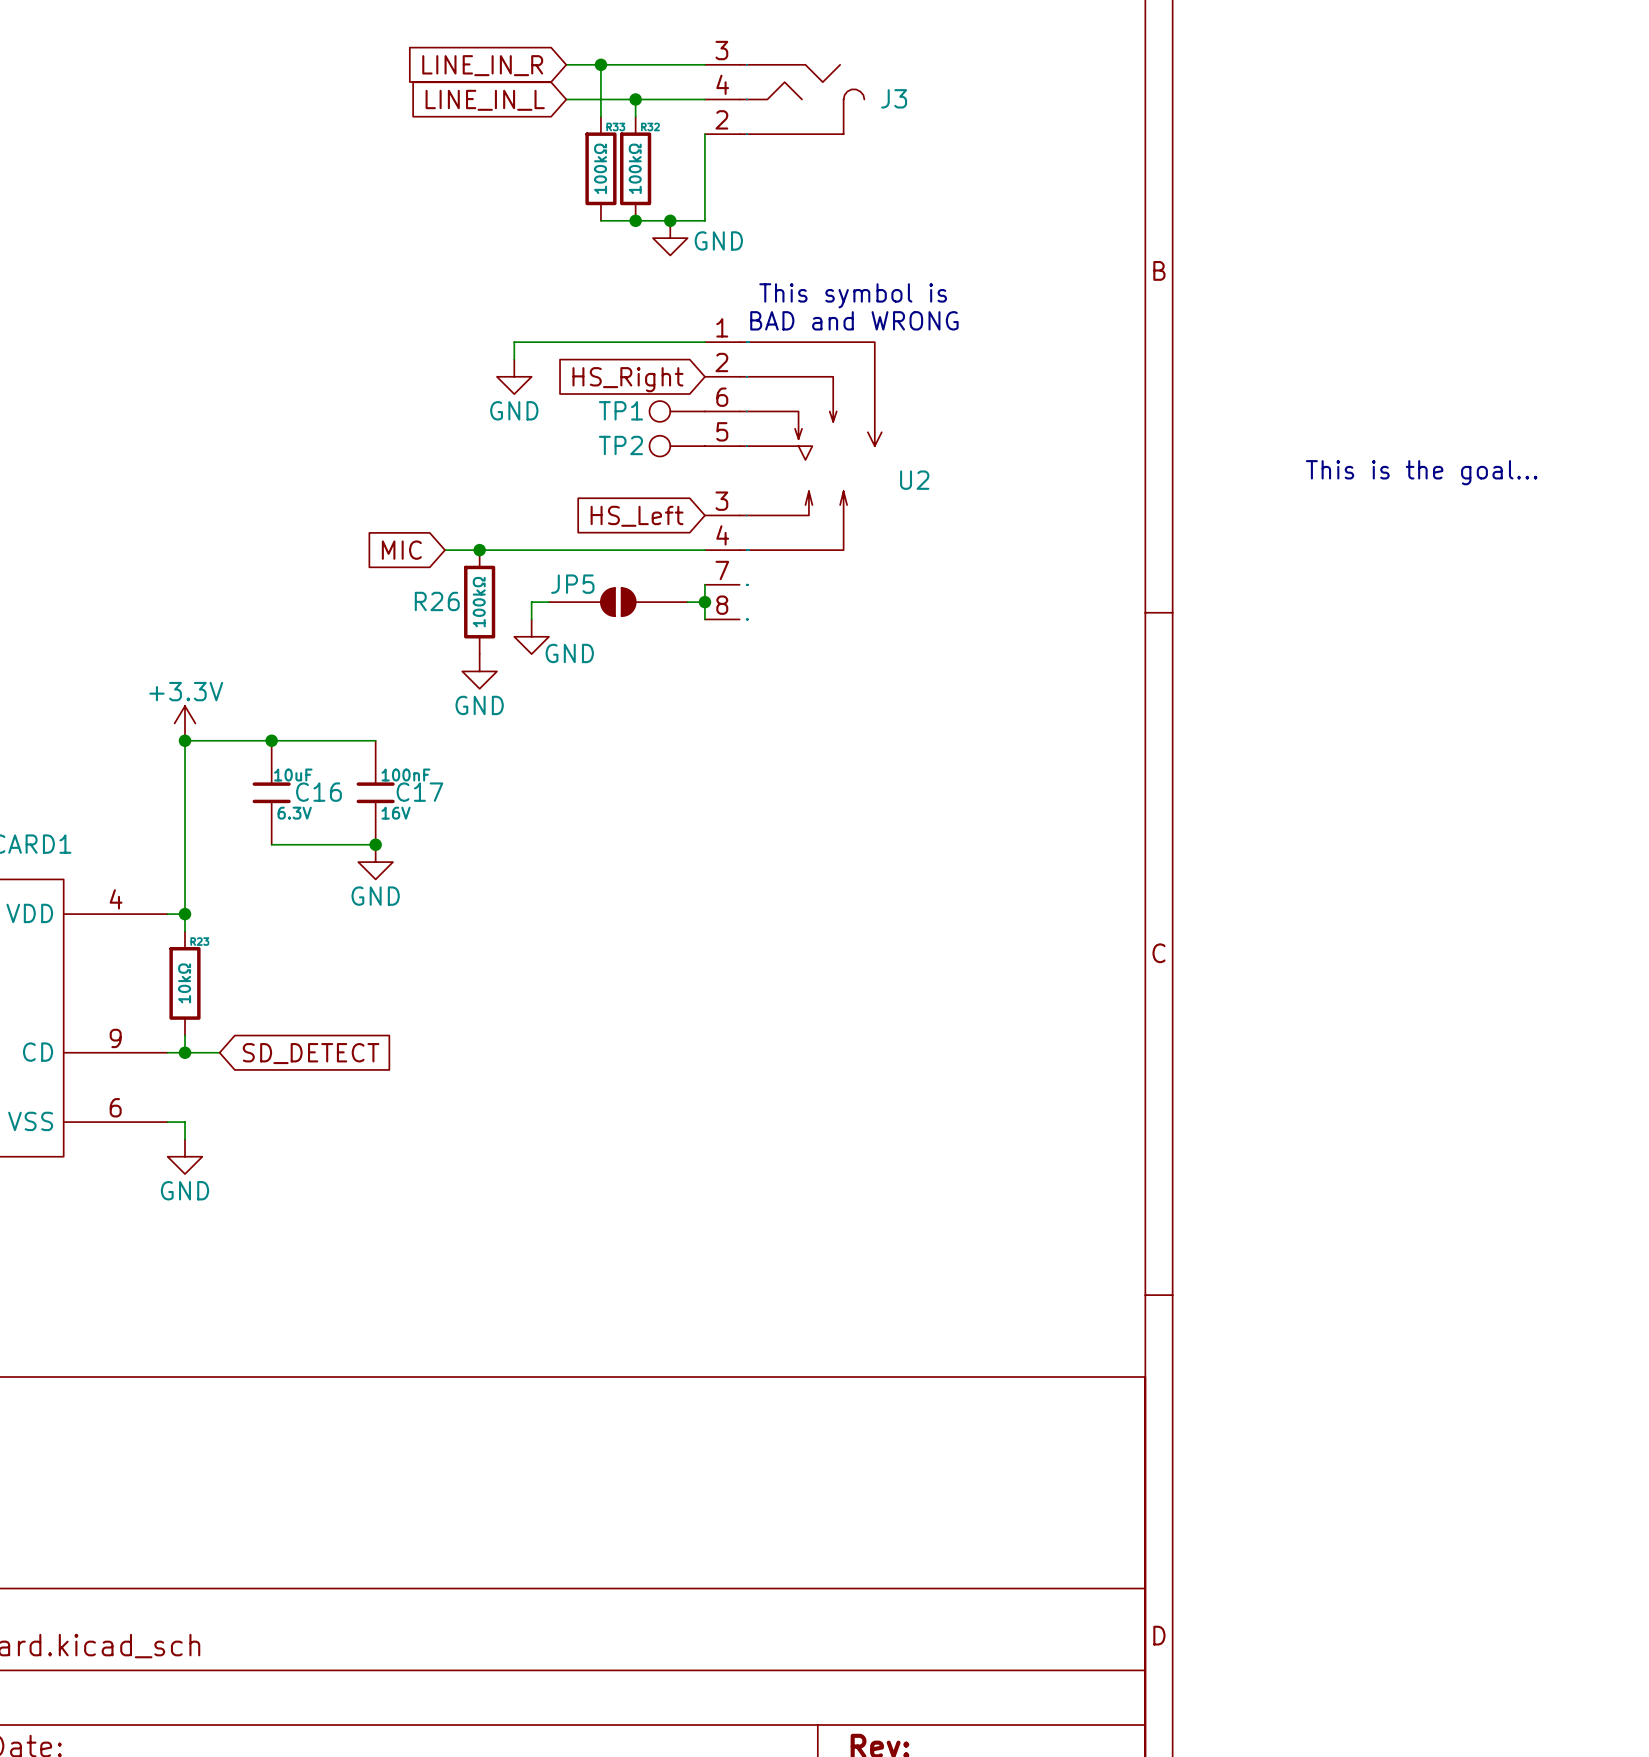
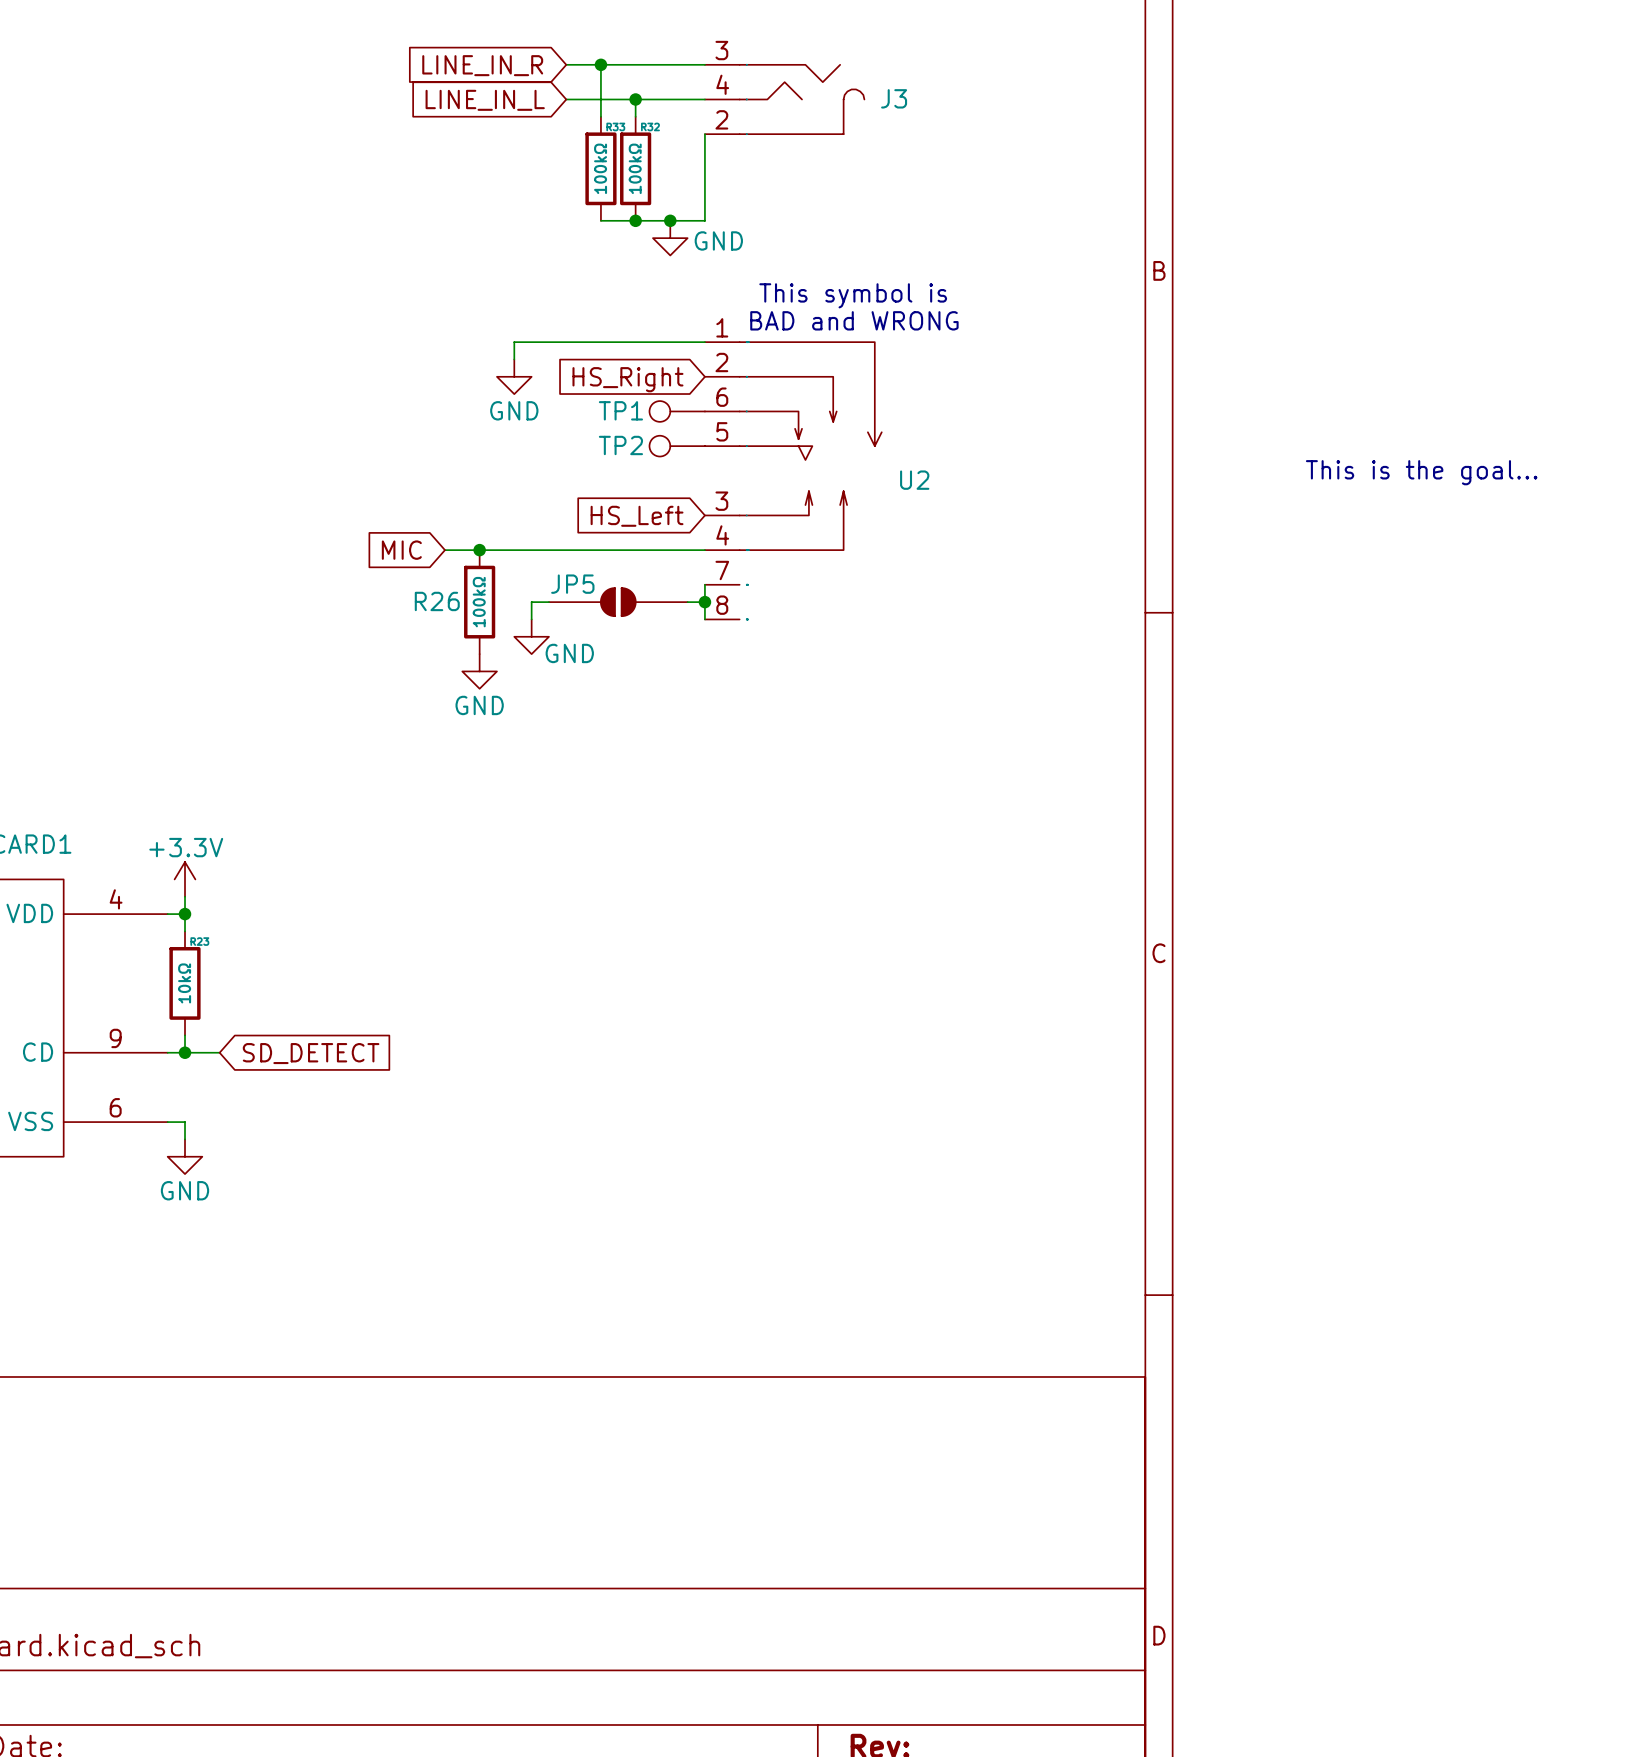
power symbol position: +3.3V (185, 723) -> +3.3V (185, 879)
junction: (185, 740) -> none
junction: (271, 740) -> none
wire: (375, 740) (185, 740) (185, 896) -> none
C16: 10uF (271, 792) -> none
C17: 100nF (375, 792) -> none
wire: (271, 844) (375, 844) -> none
junction: (375, 844) -> none
power symbol: GND (375, 862) -> none

